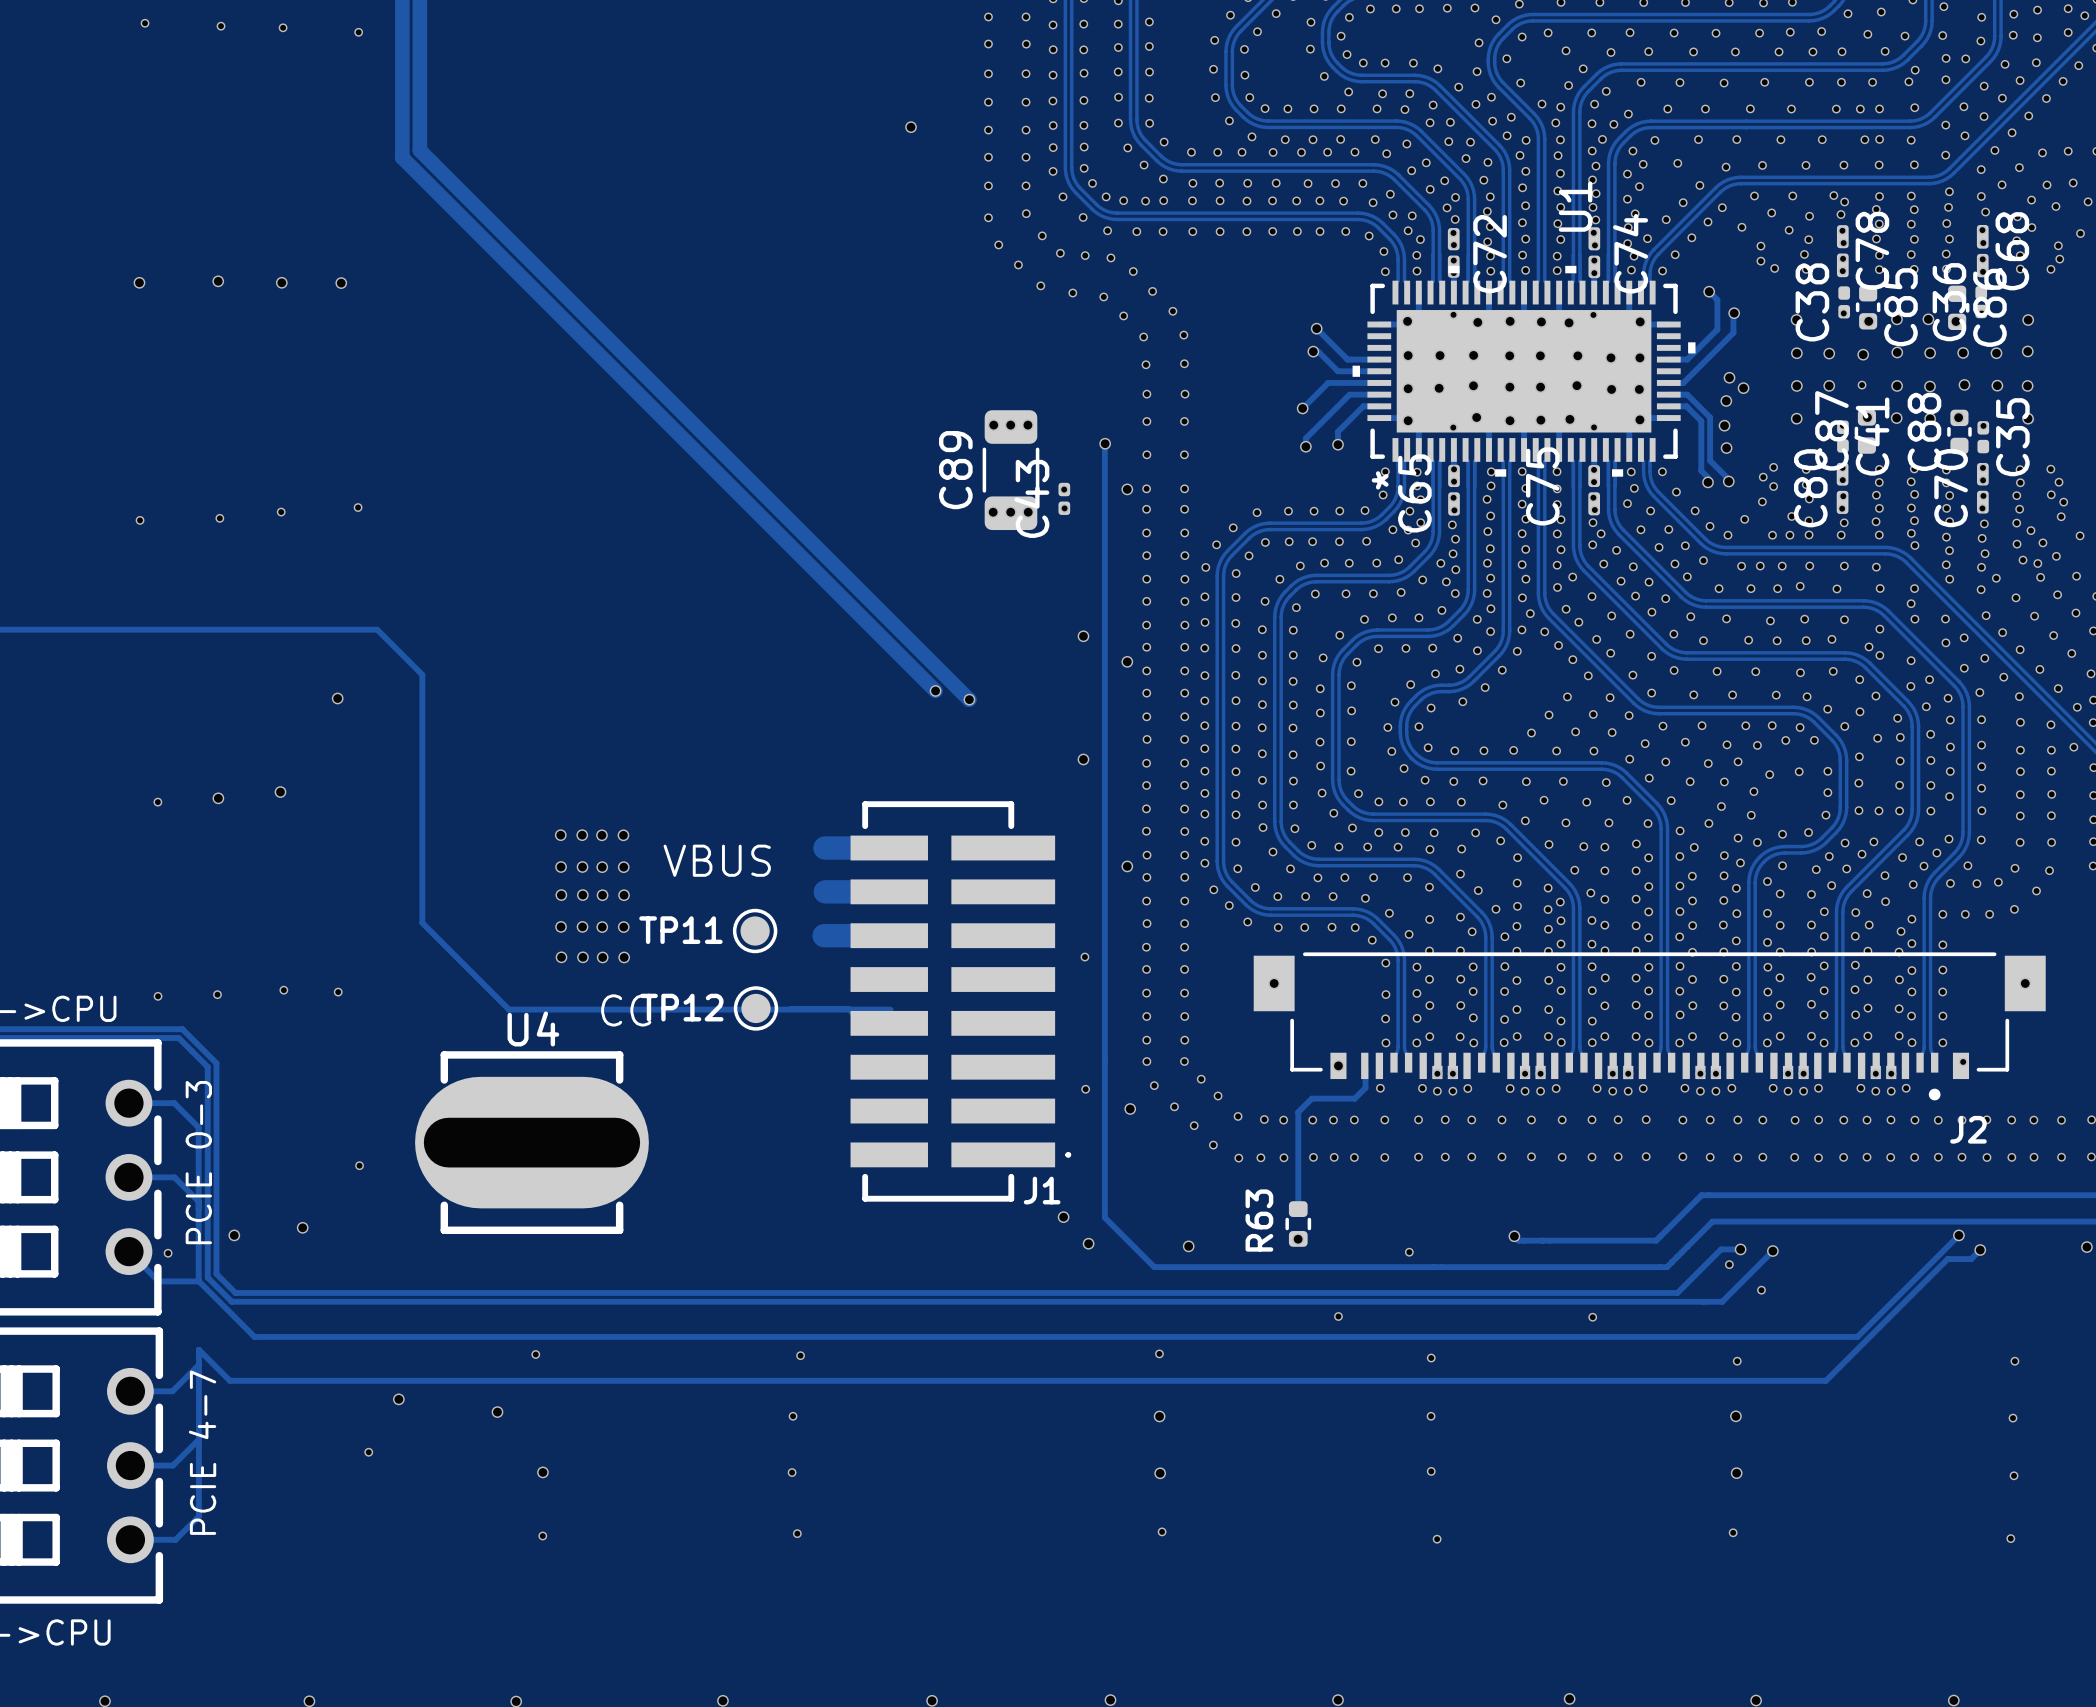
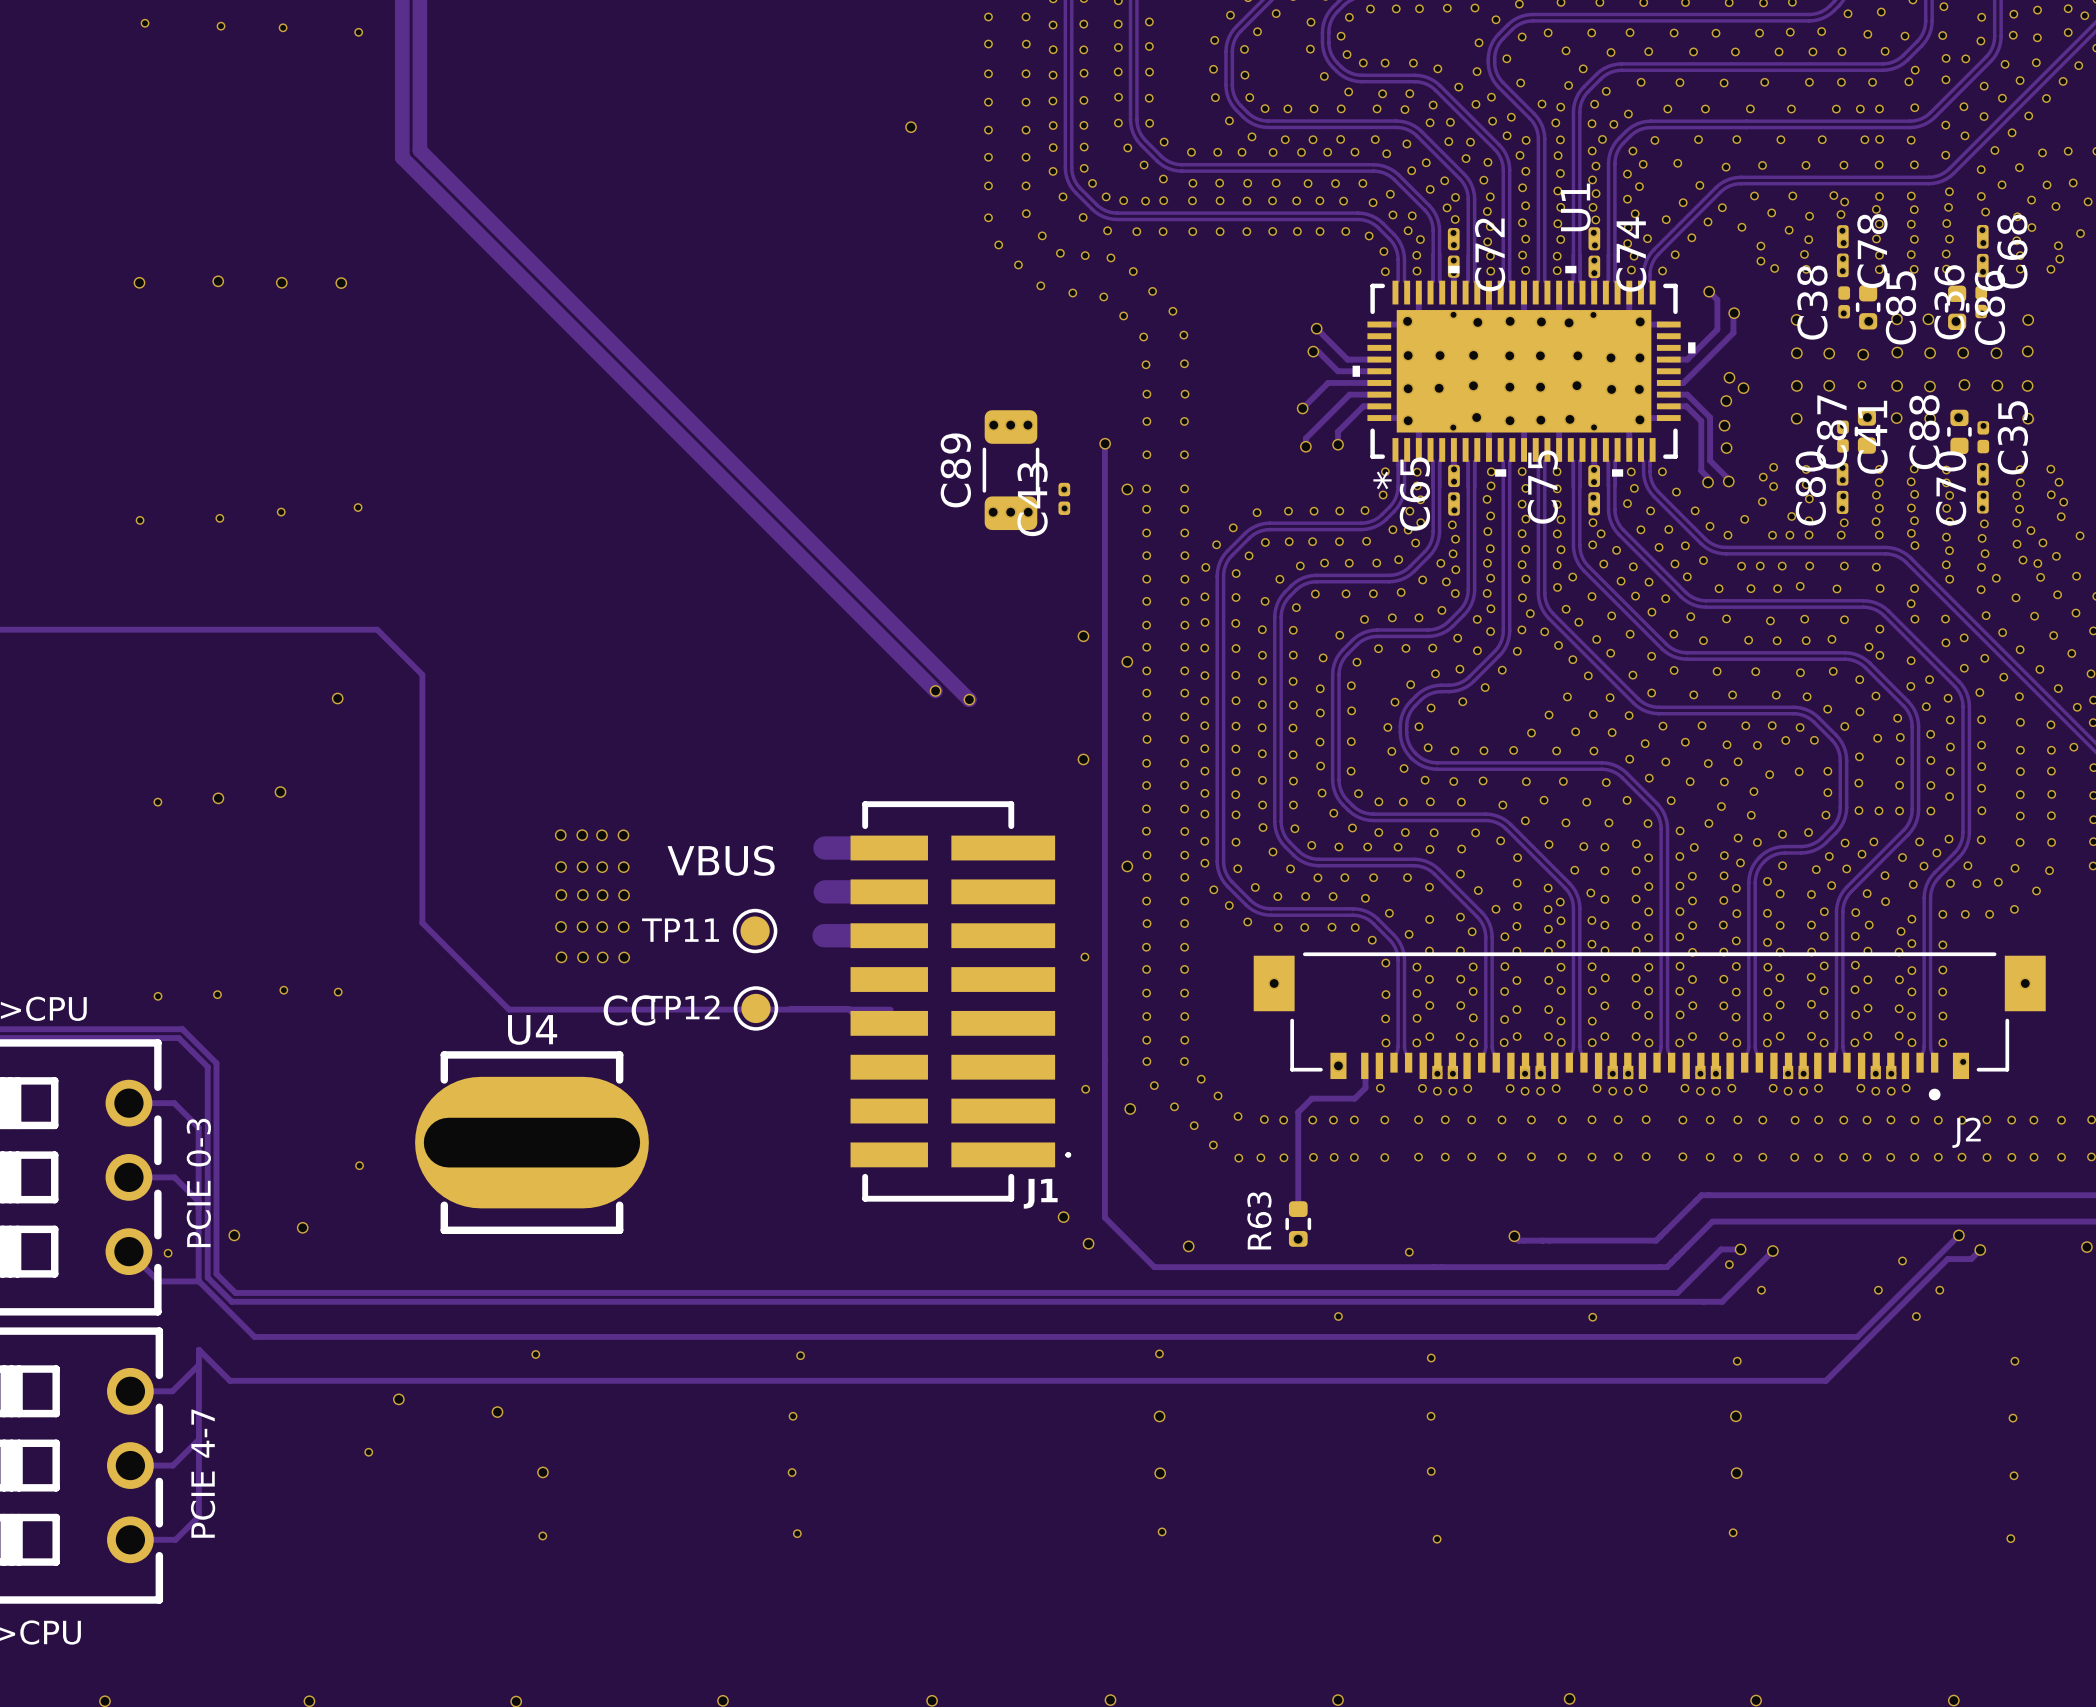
via: none -> (1902, 1260)
via: none -> (1878, 1290)
via: none -> (1939, 1290)
via: none -> (1916, 1316)

